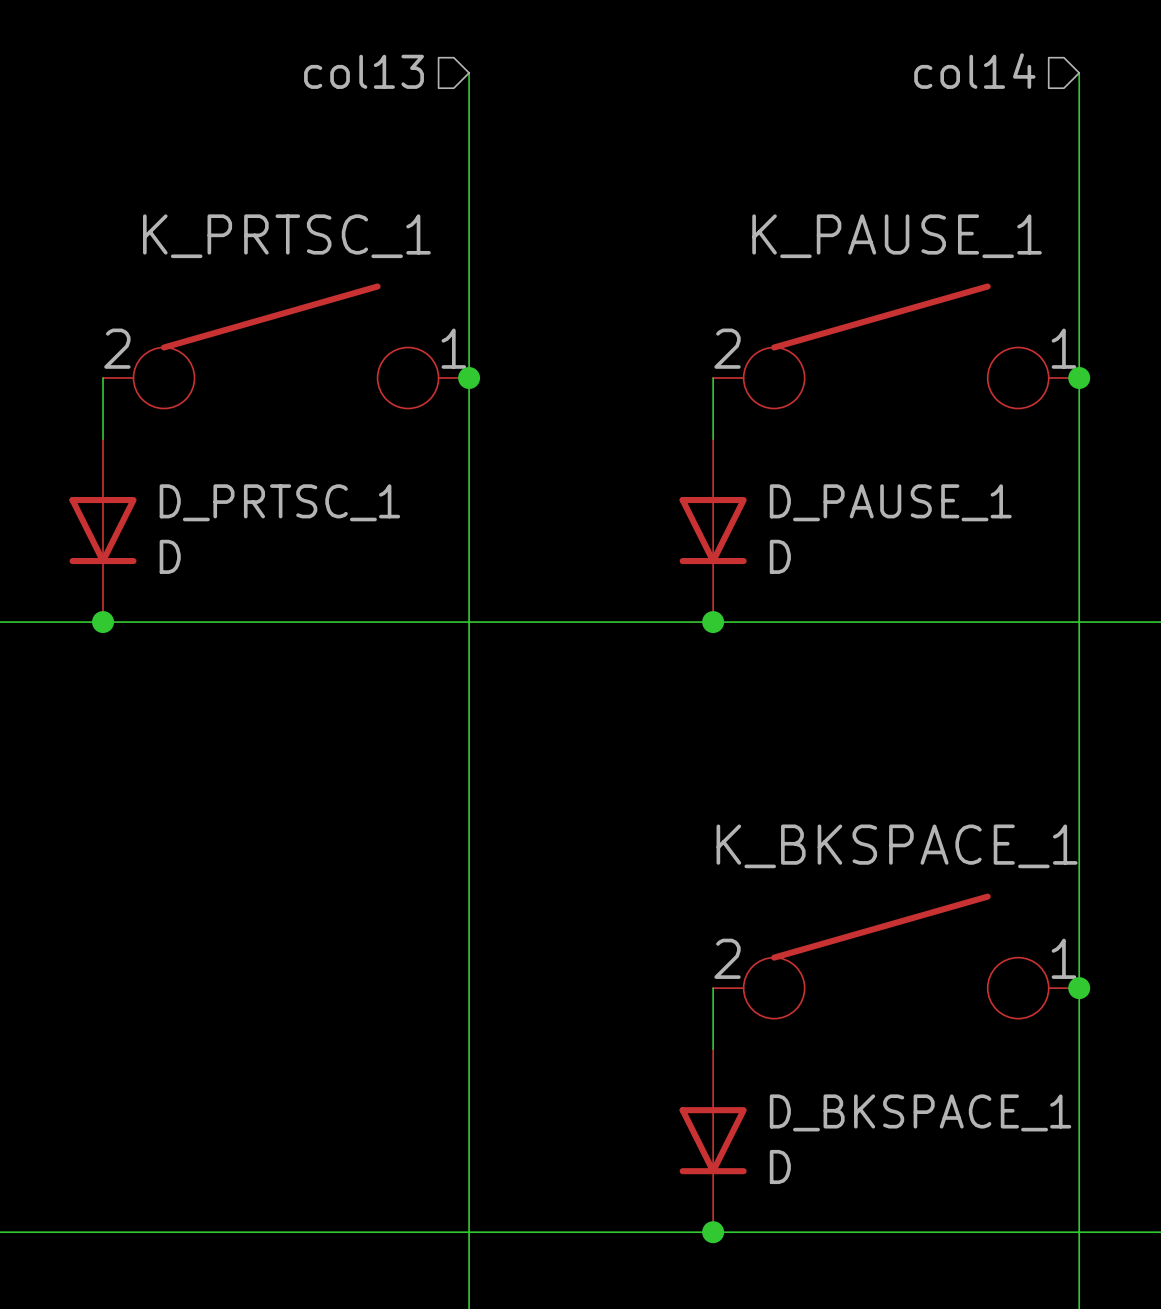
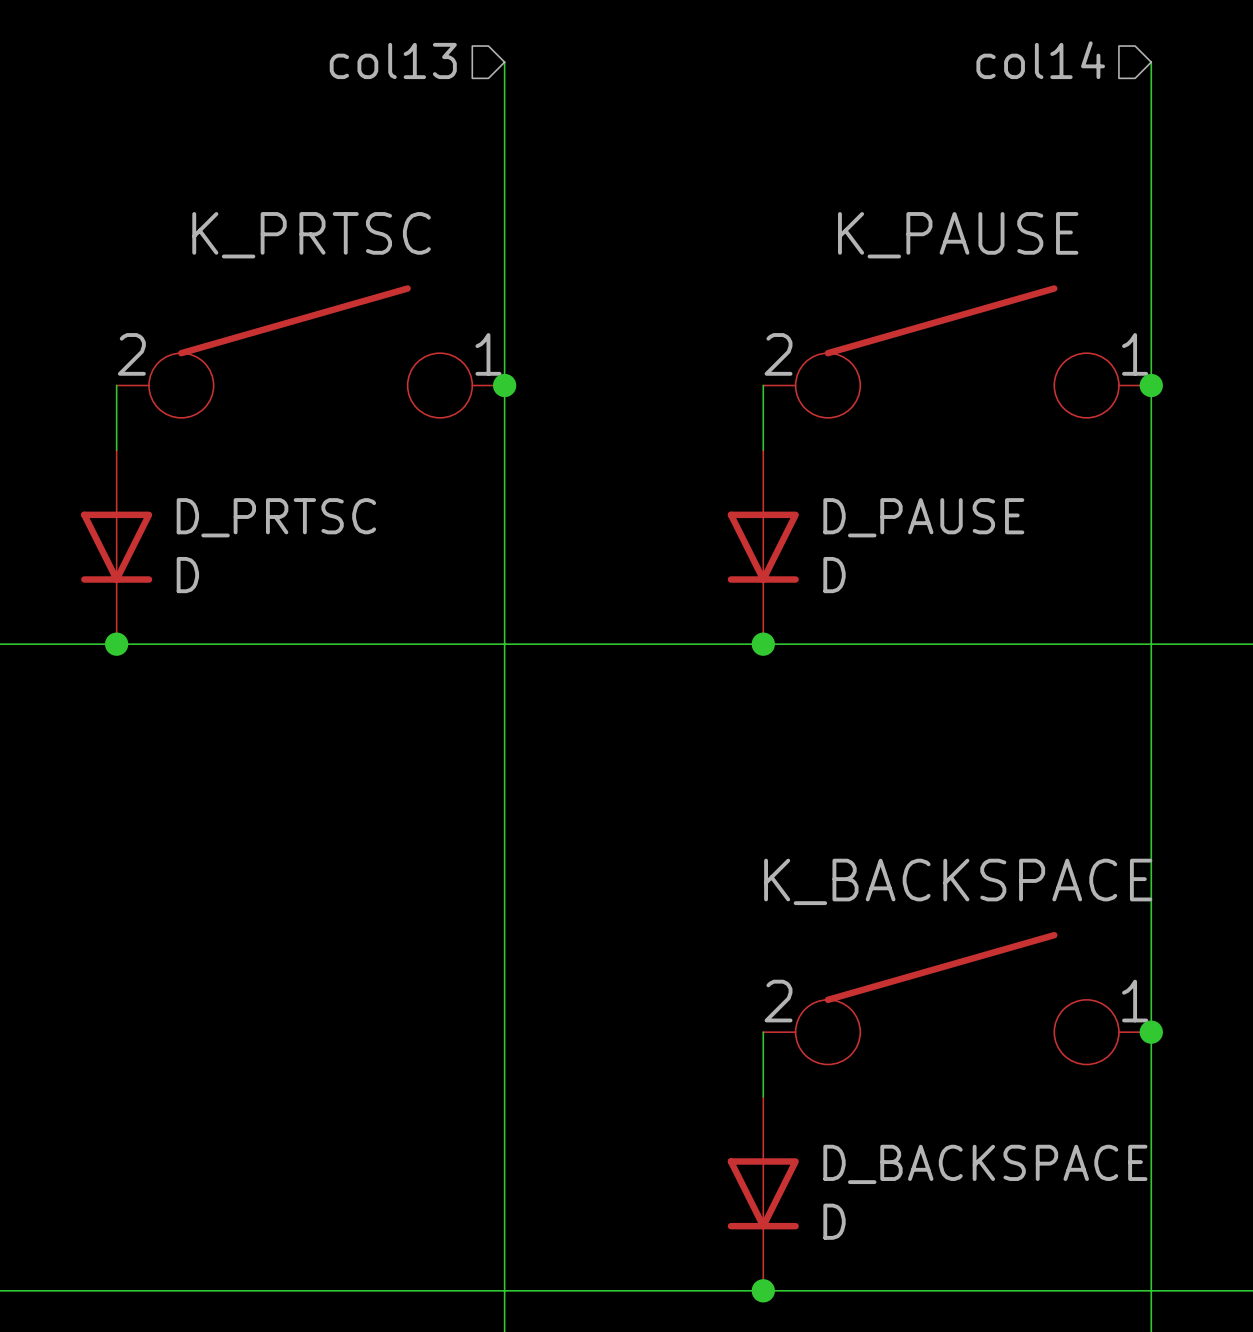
K_PRTSC_1 name: K_PRTSC_1 (286, 236) -> K_PRTSC (311, 235)
K_PAUSE_1 name: K_PAUSE_1 (897, 236) -> K_PAUSE (958, 235)
D_PRTSC_1 name: D_PRTSC_1 (279, 502) -> D_PRTSC (276, 517)
D_PAUSE_1 name: D_PAUSE_1 (890, 502) -> D_PAUSE (923, 517)
K_BKSPACE_1 name: K_BKSPACE_1 (897, 846) -> K_BACKSPACE (958, 881)
D_BKSPACE_1 name: D_BKSPACE_1 (920, 1112) -> D_BACKSPACE (985, 1164)

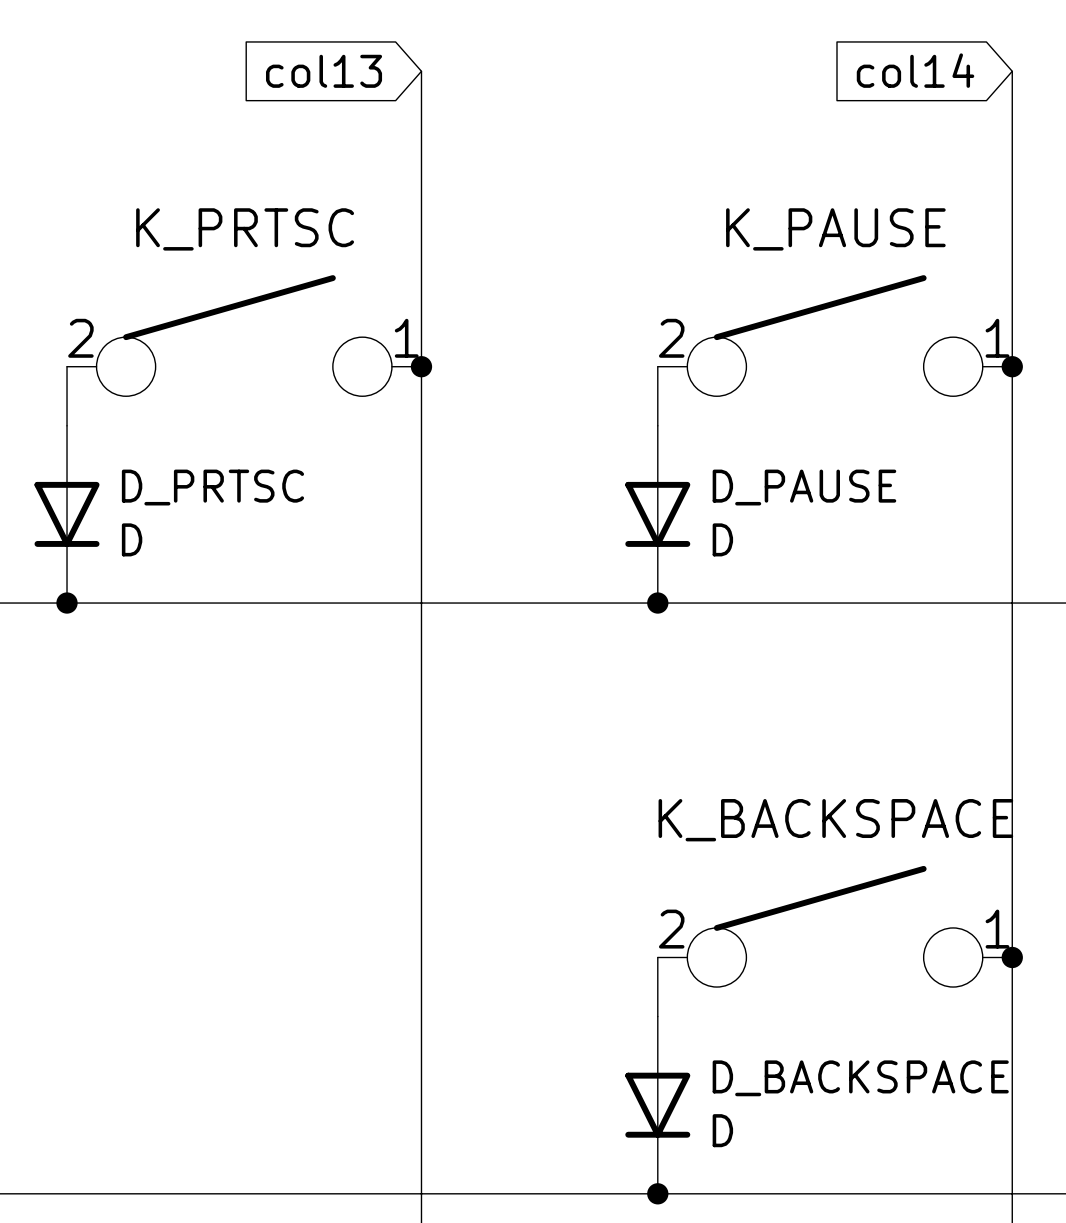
hierarchical label: col13 (393, 60) -> none
hierarchical label: col14 (1040, 60) -> none
global label: none -> col14 (915, 70)
global label: none -> col13 (324, 71)

